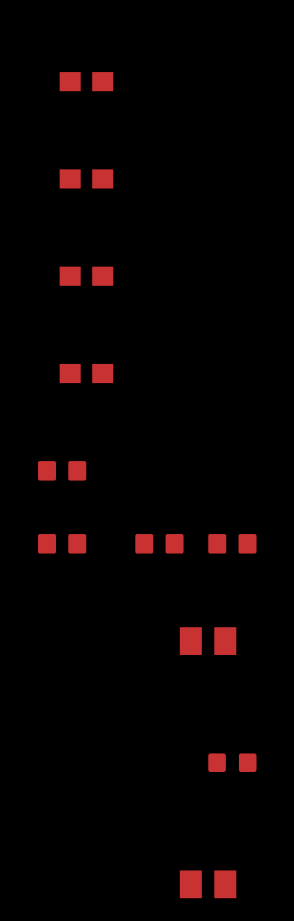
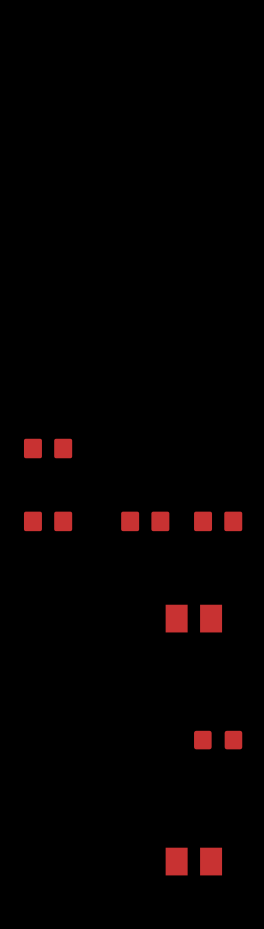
part: (86, 81) -> none
part: (86, 178) -> none
part: (86, 276) -> none
part: (86, 373) -> none

